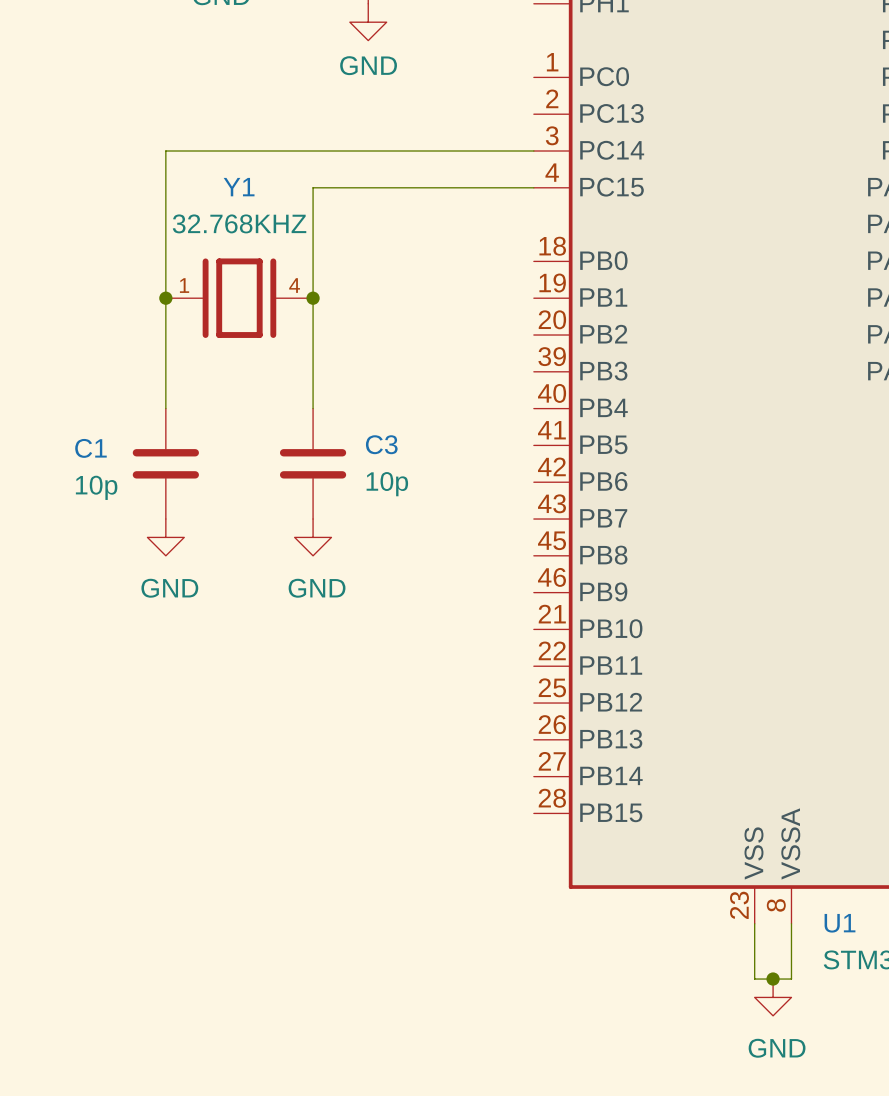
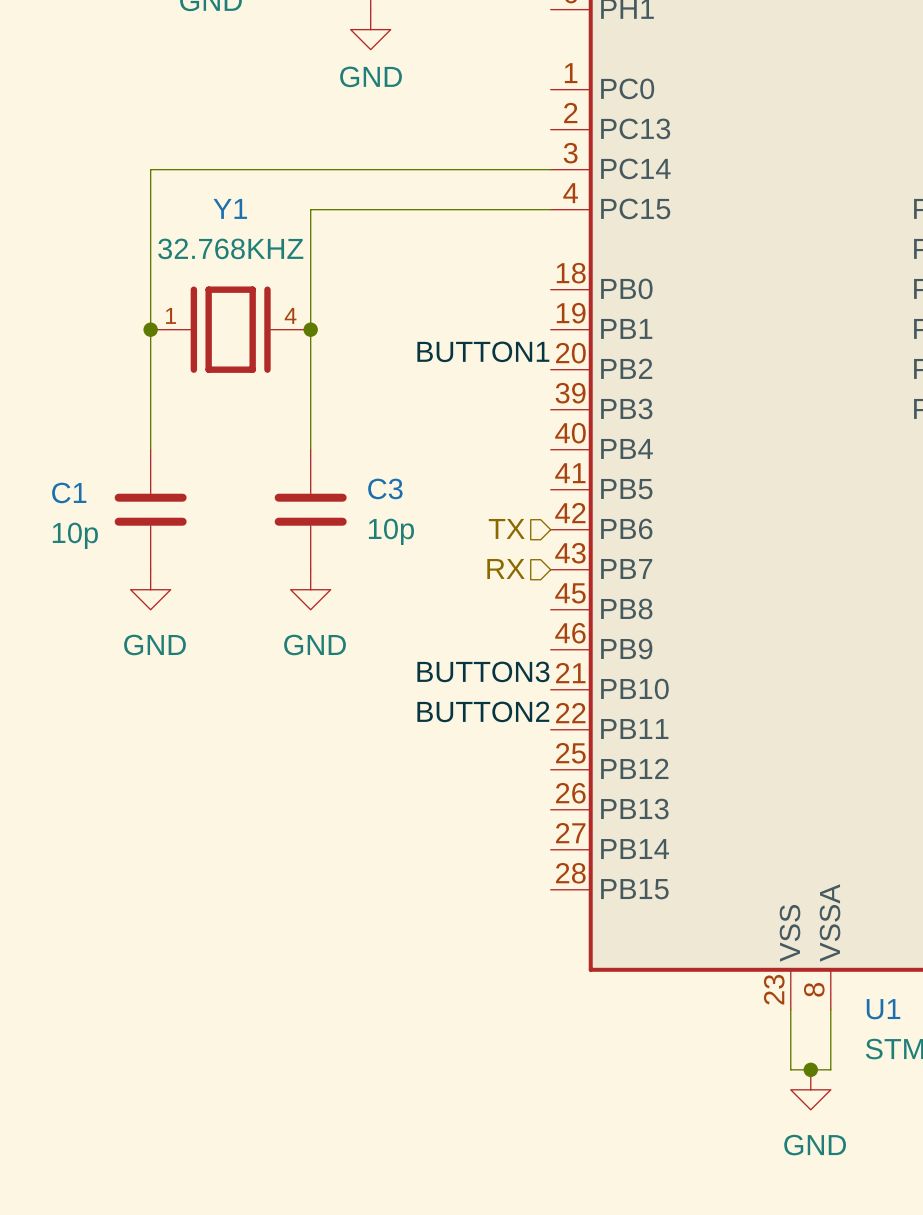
label: none -> BUTTON1 (483, 351)
hierarchical label: none -> TX (506, 528)
hierarchical label: none -> RX (506, 568)
label: none -> BUTTON3 (483, 671)
label: none -> BUTTON2 (483, 711)

